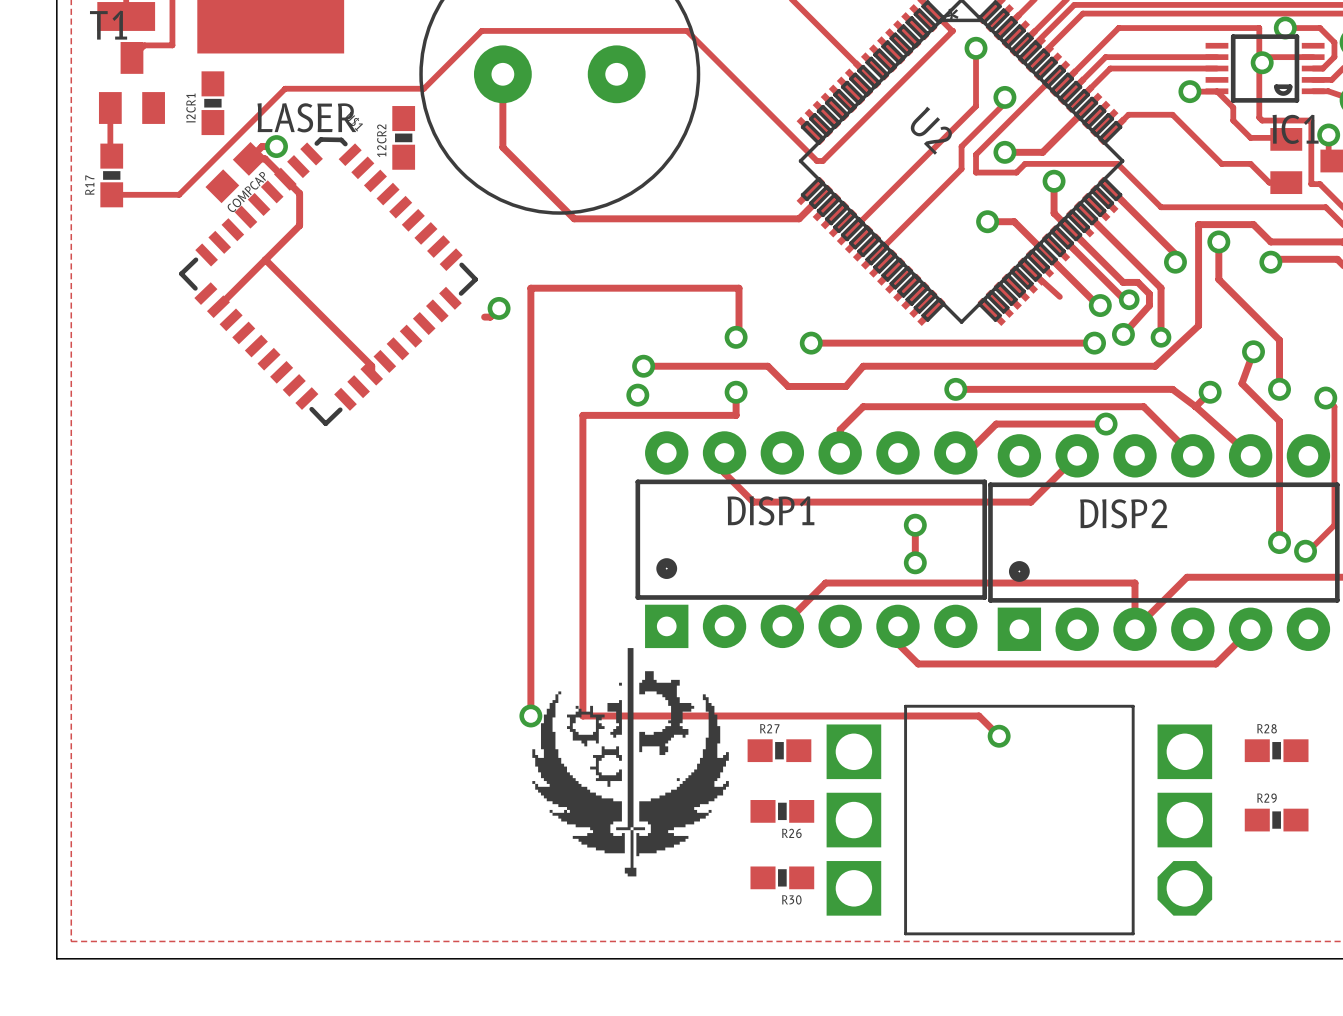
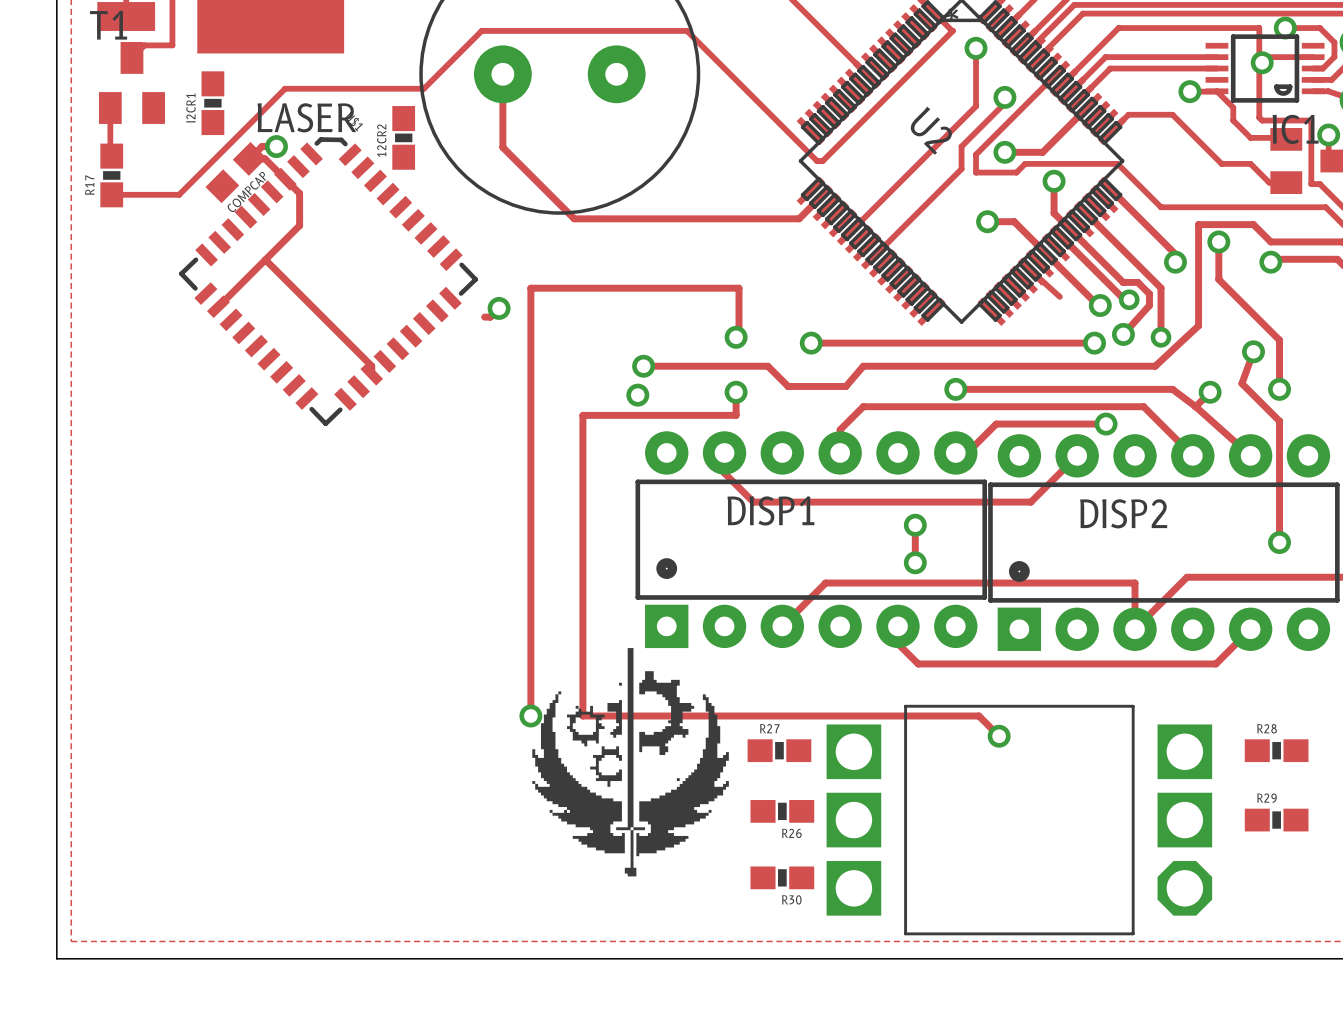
track: (1325, 398) (1334, 406) (1334, 525) (1308, 551) (1305, 551) -> none
via: (1325, 398) -> none
via: (1305, 551) -> none

